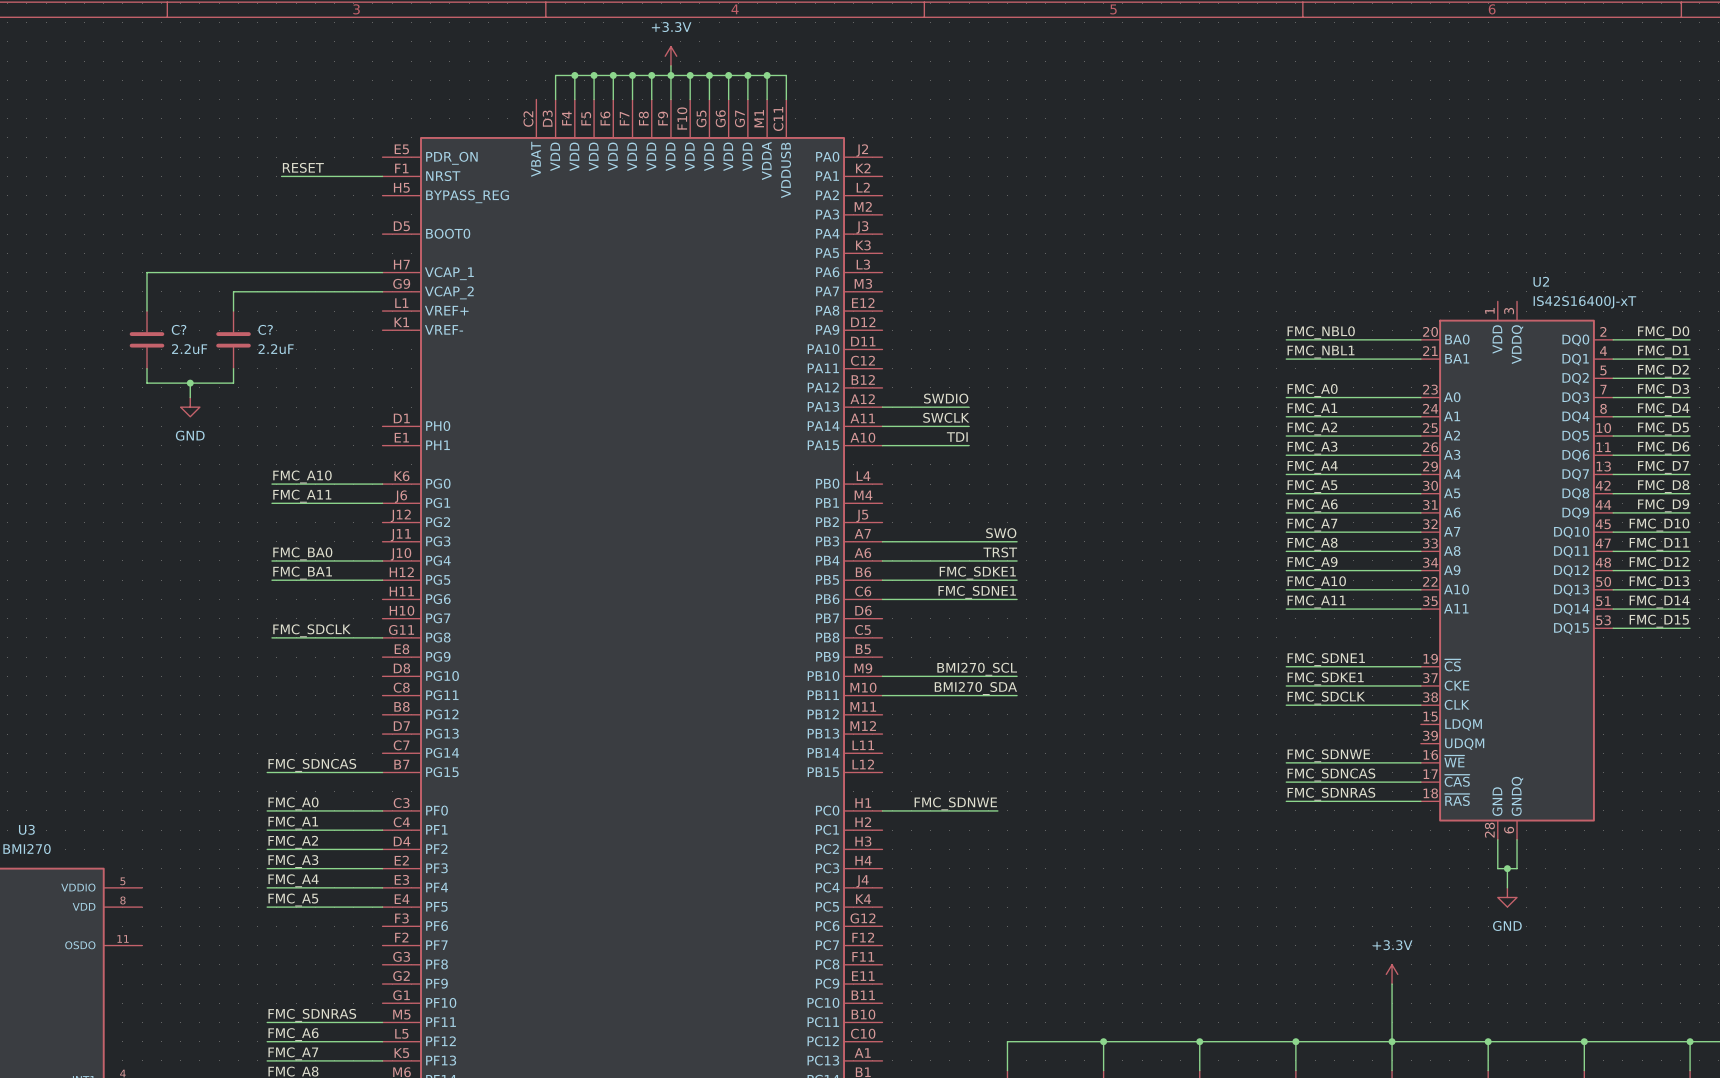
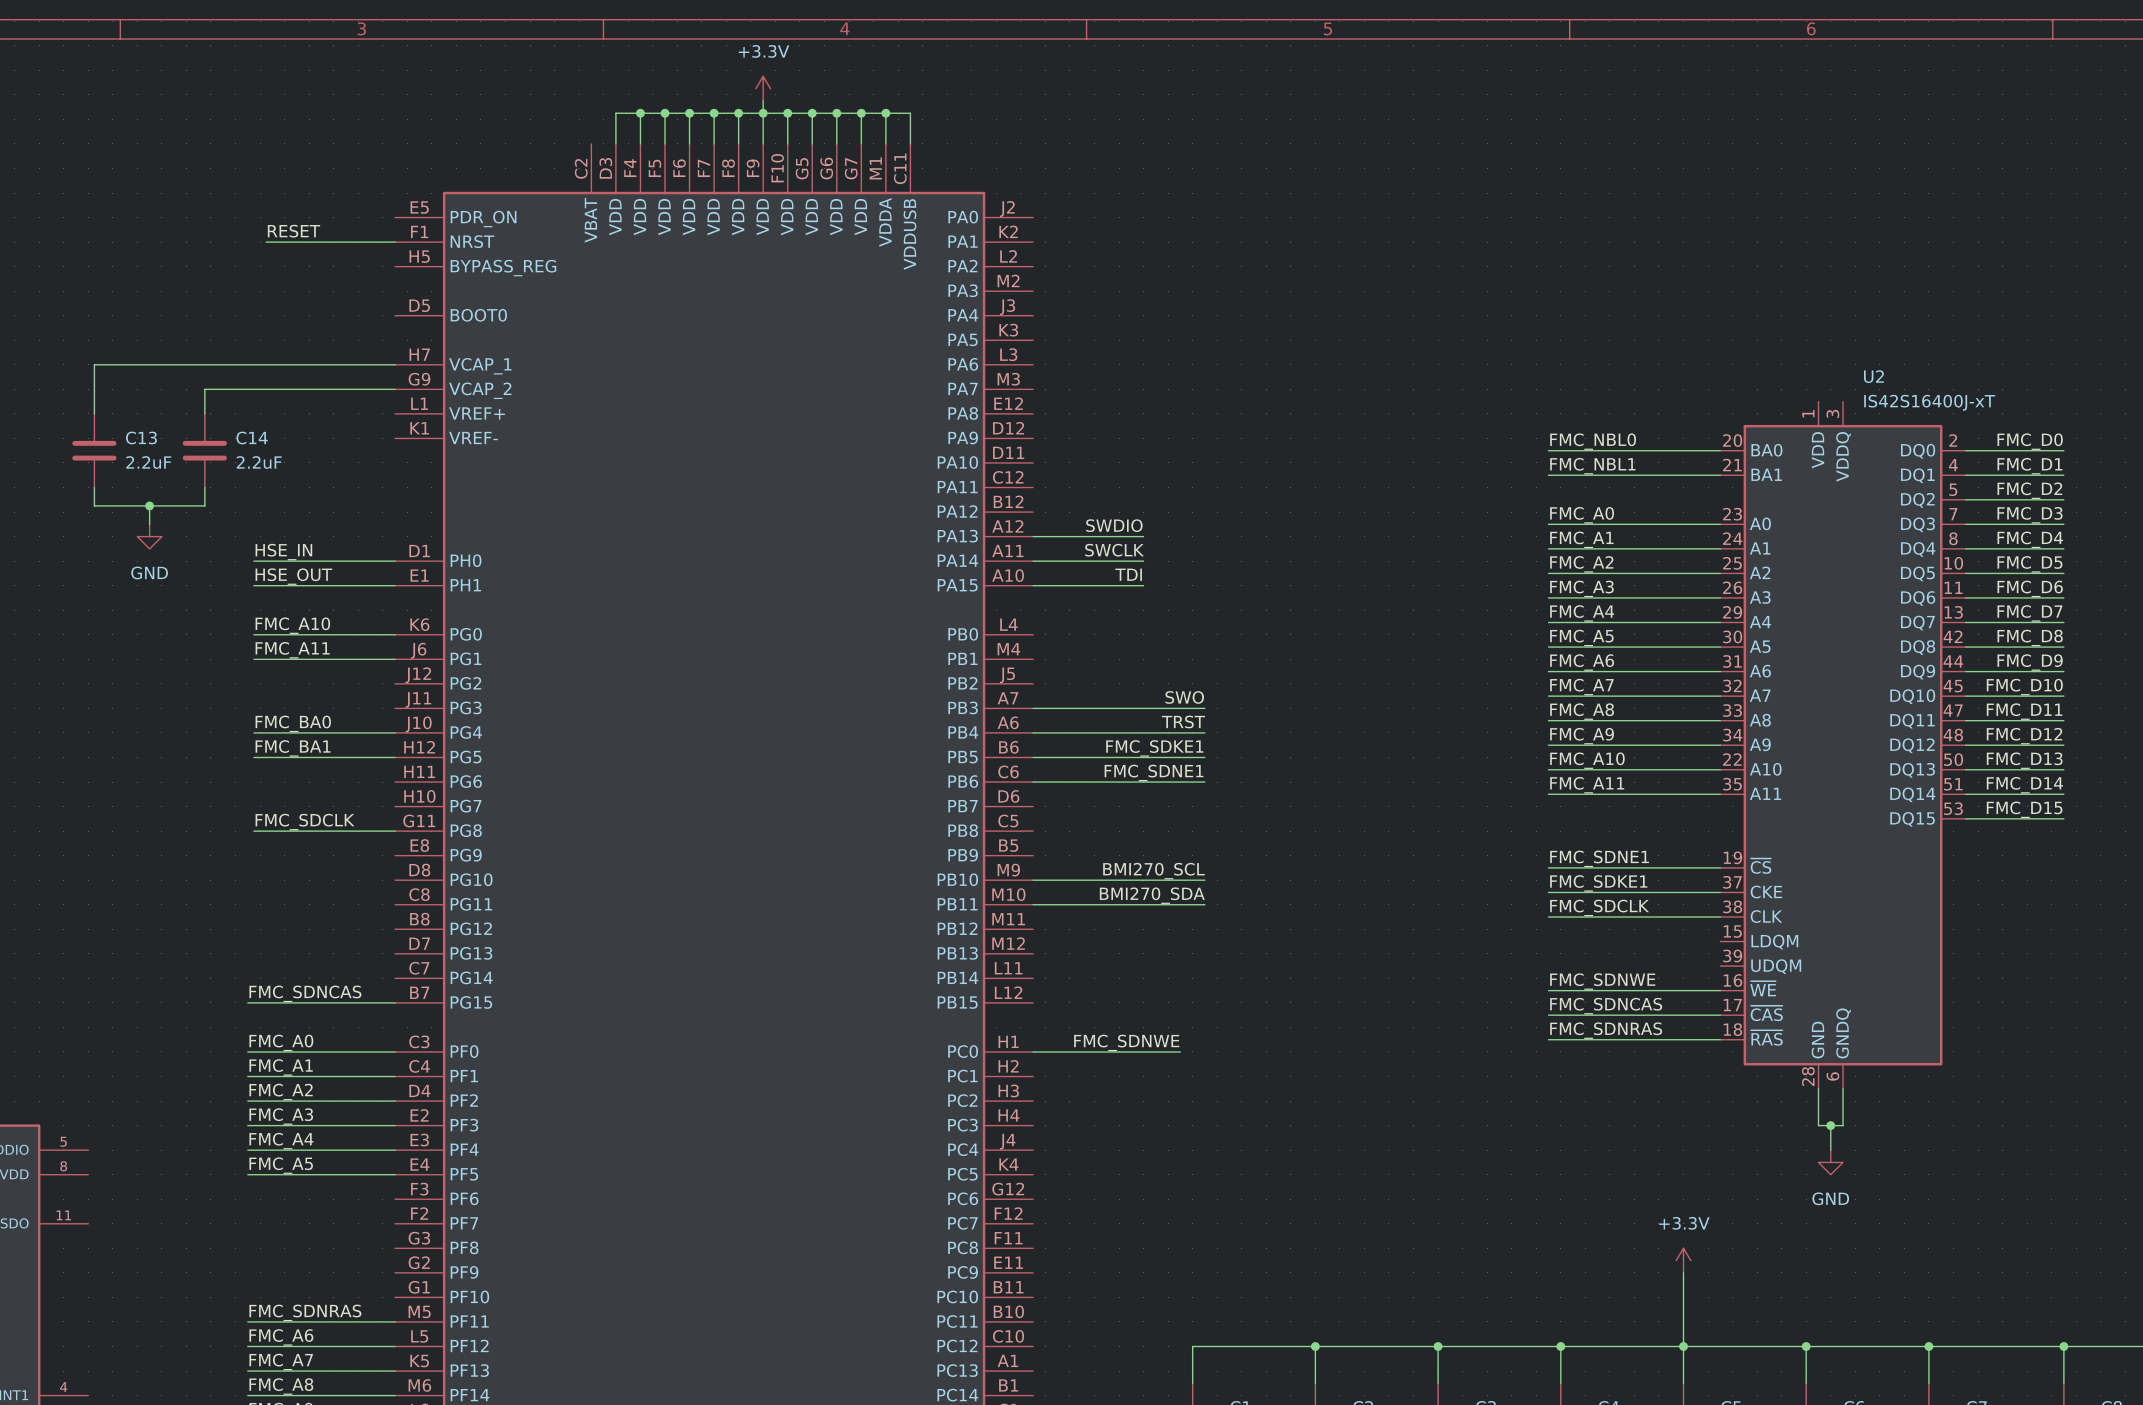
C? name: C? (179, 329) -> C13 (141, 437)
C? name: C? (265, 329) -> C14 (252, 437)
label: none -> HSE_IN (283, 552)
wire: none -> (253, 561) (395, 561)
label: none -> HSE_OUT (293, 576)
wire: none -> (253, 585) (395, 585)

